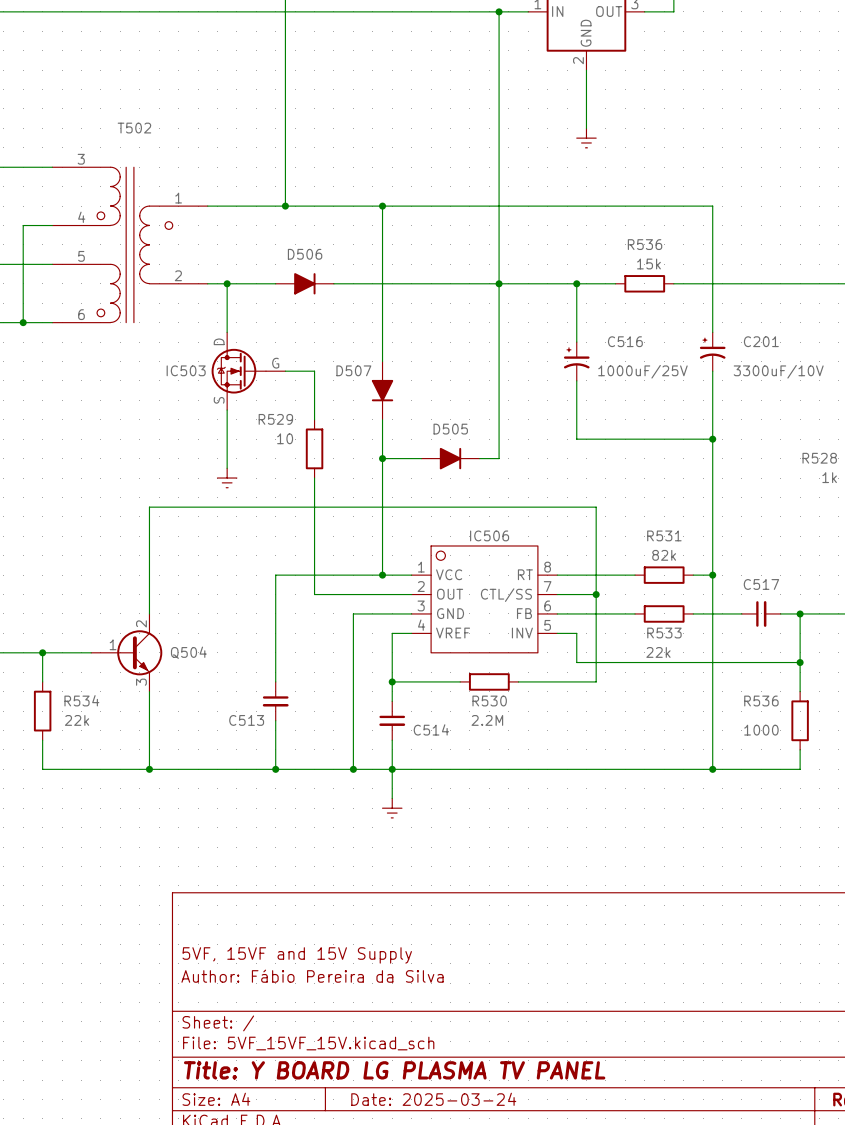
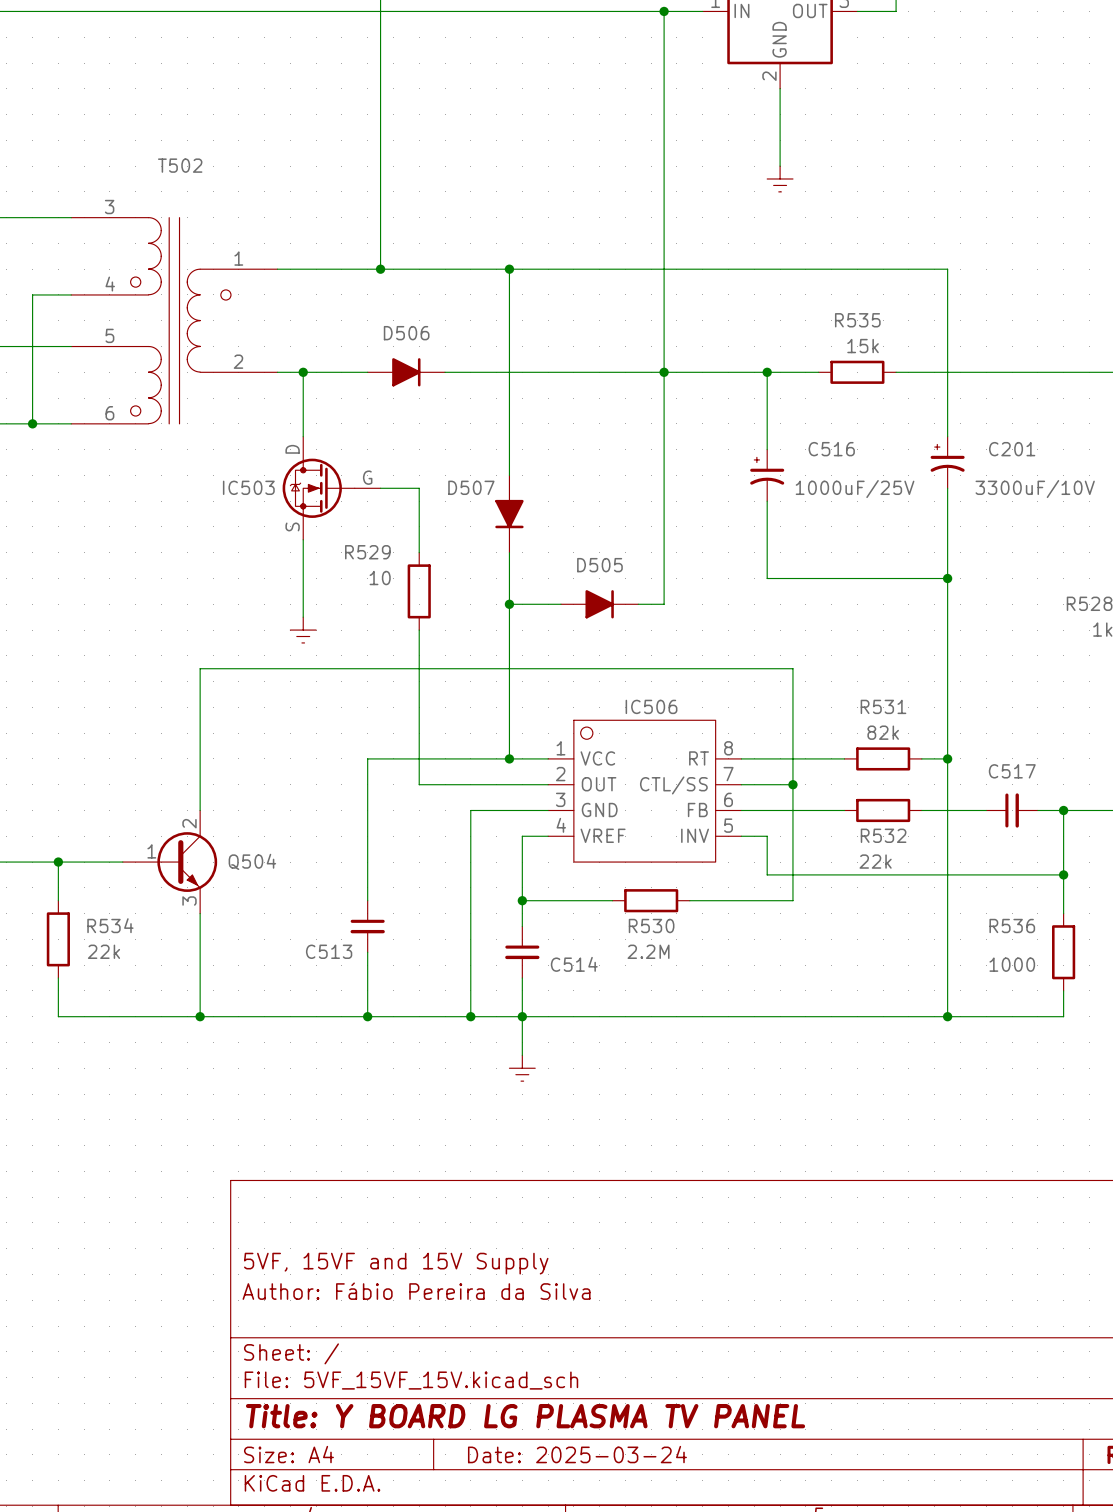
R536 name: R536 (645, 244) -> R535 (857, 320)
R533 name: R533 (664, 633) -> R532 (883, 835)

